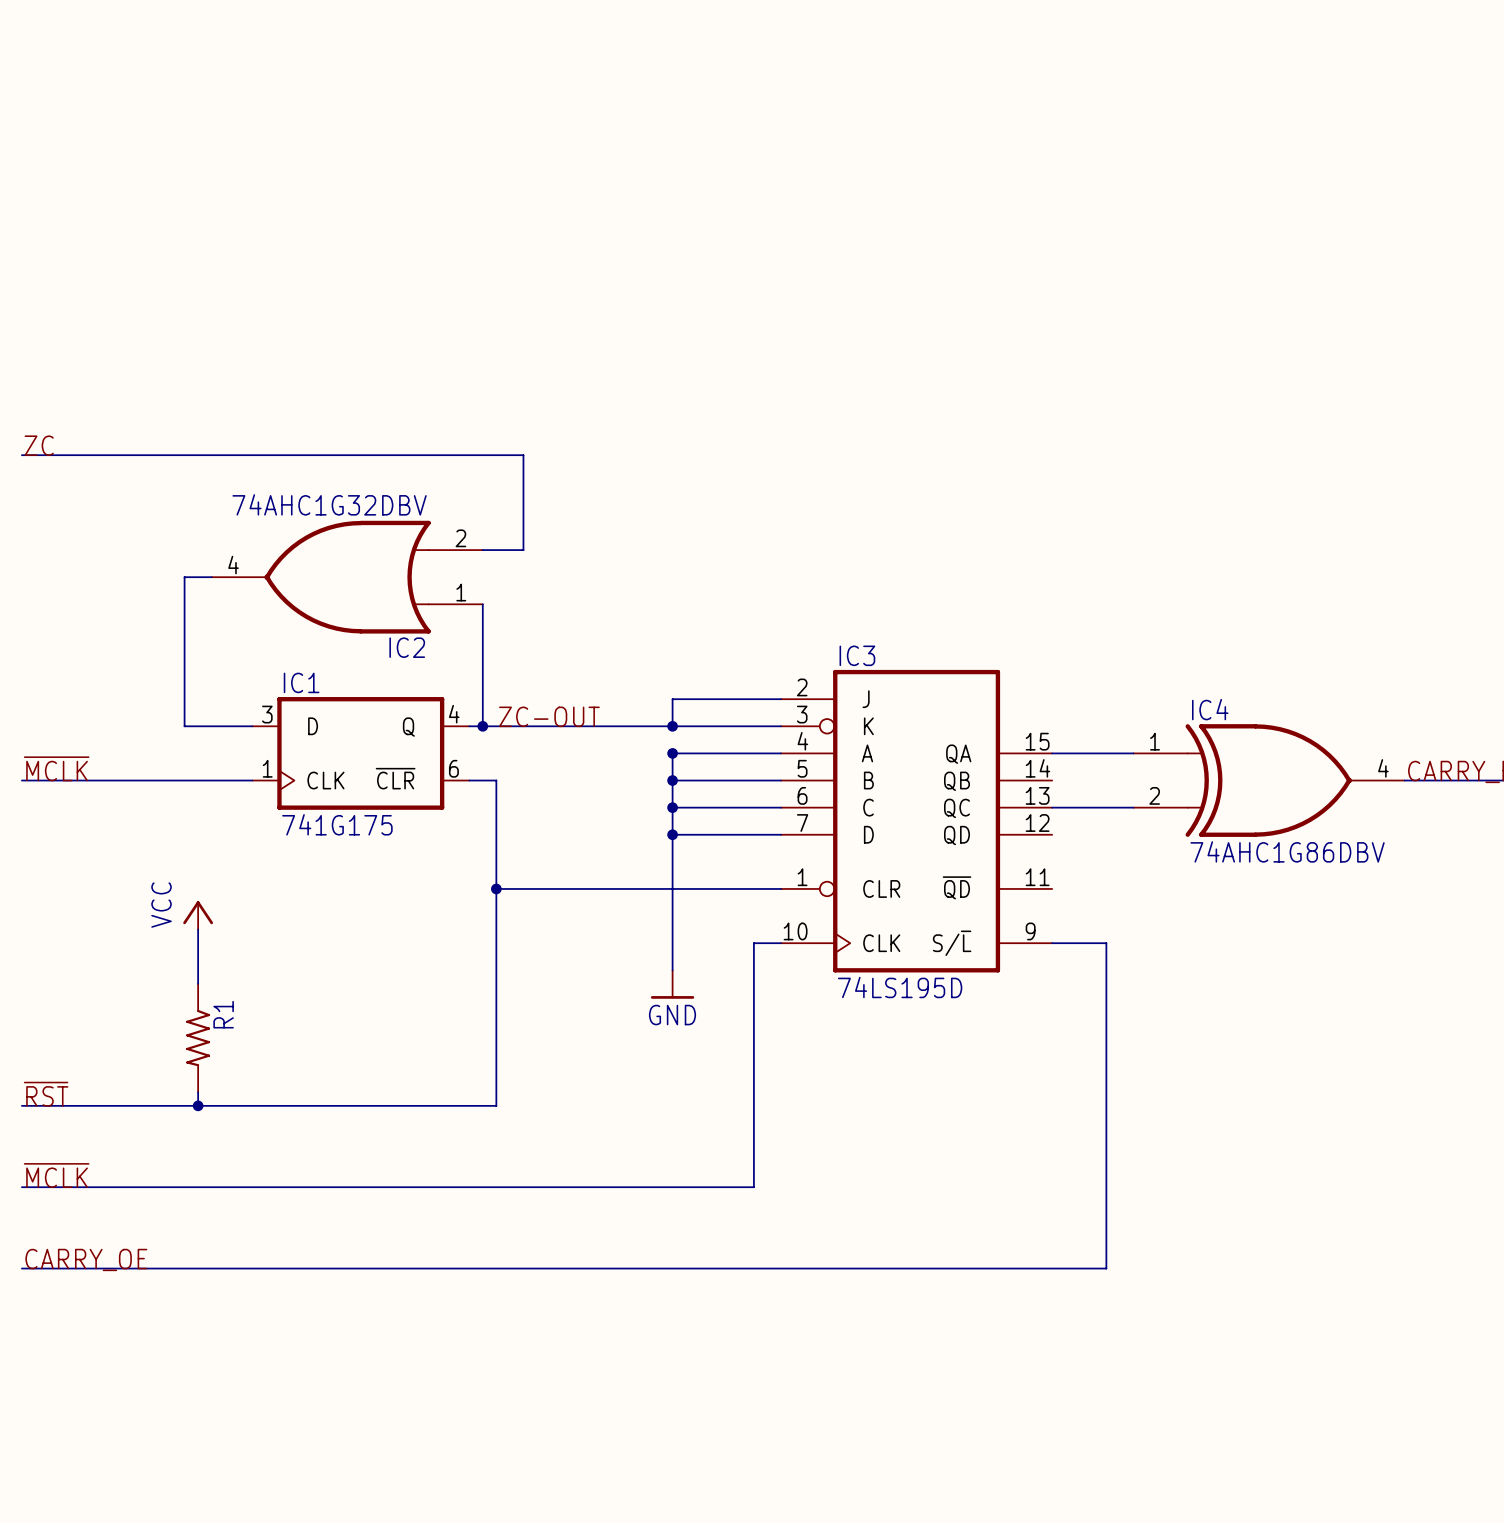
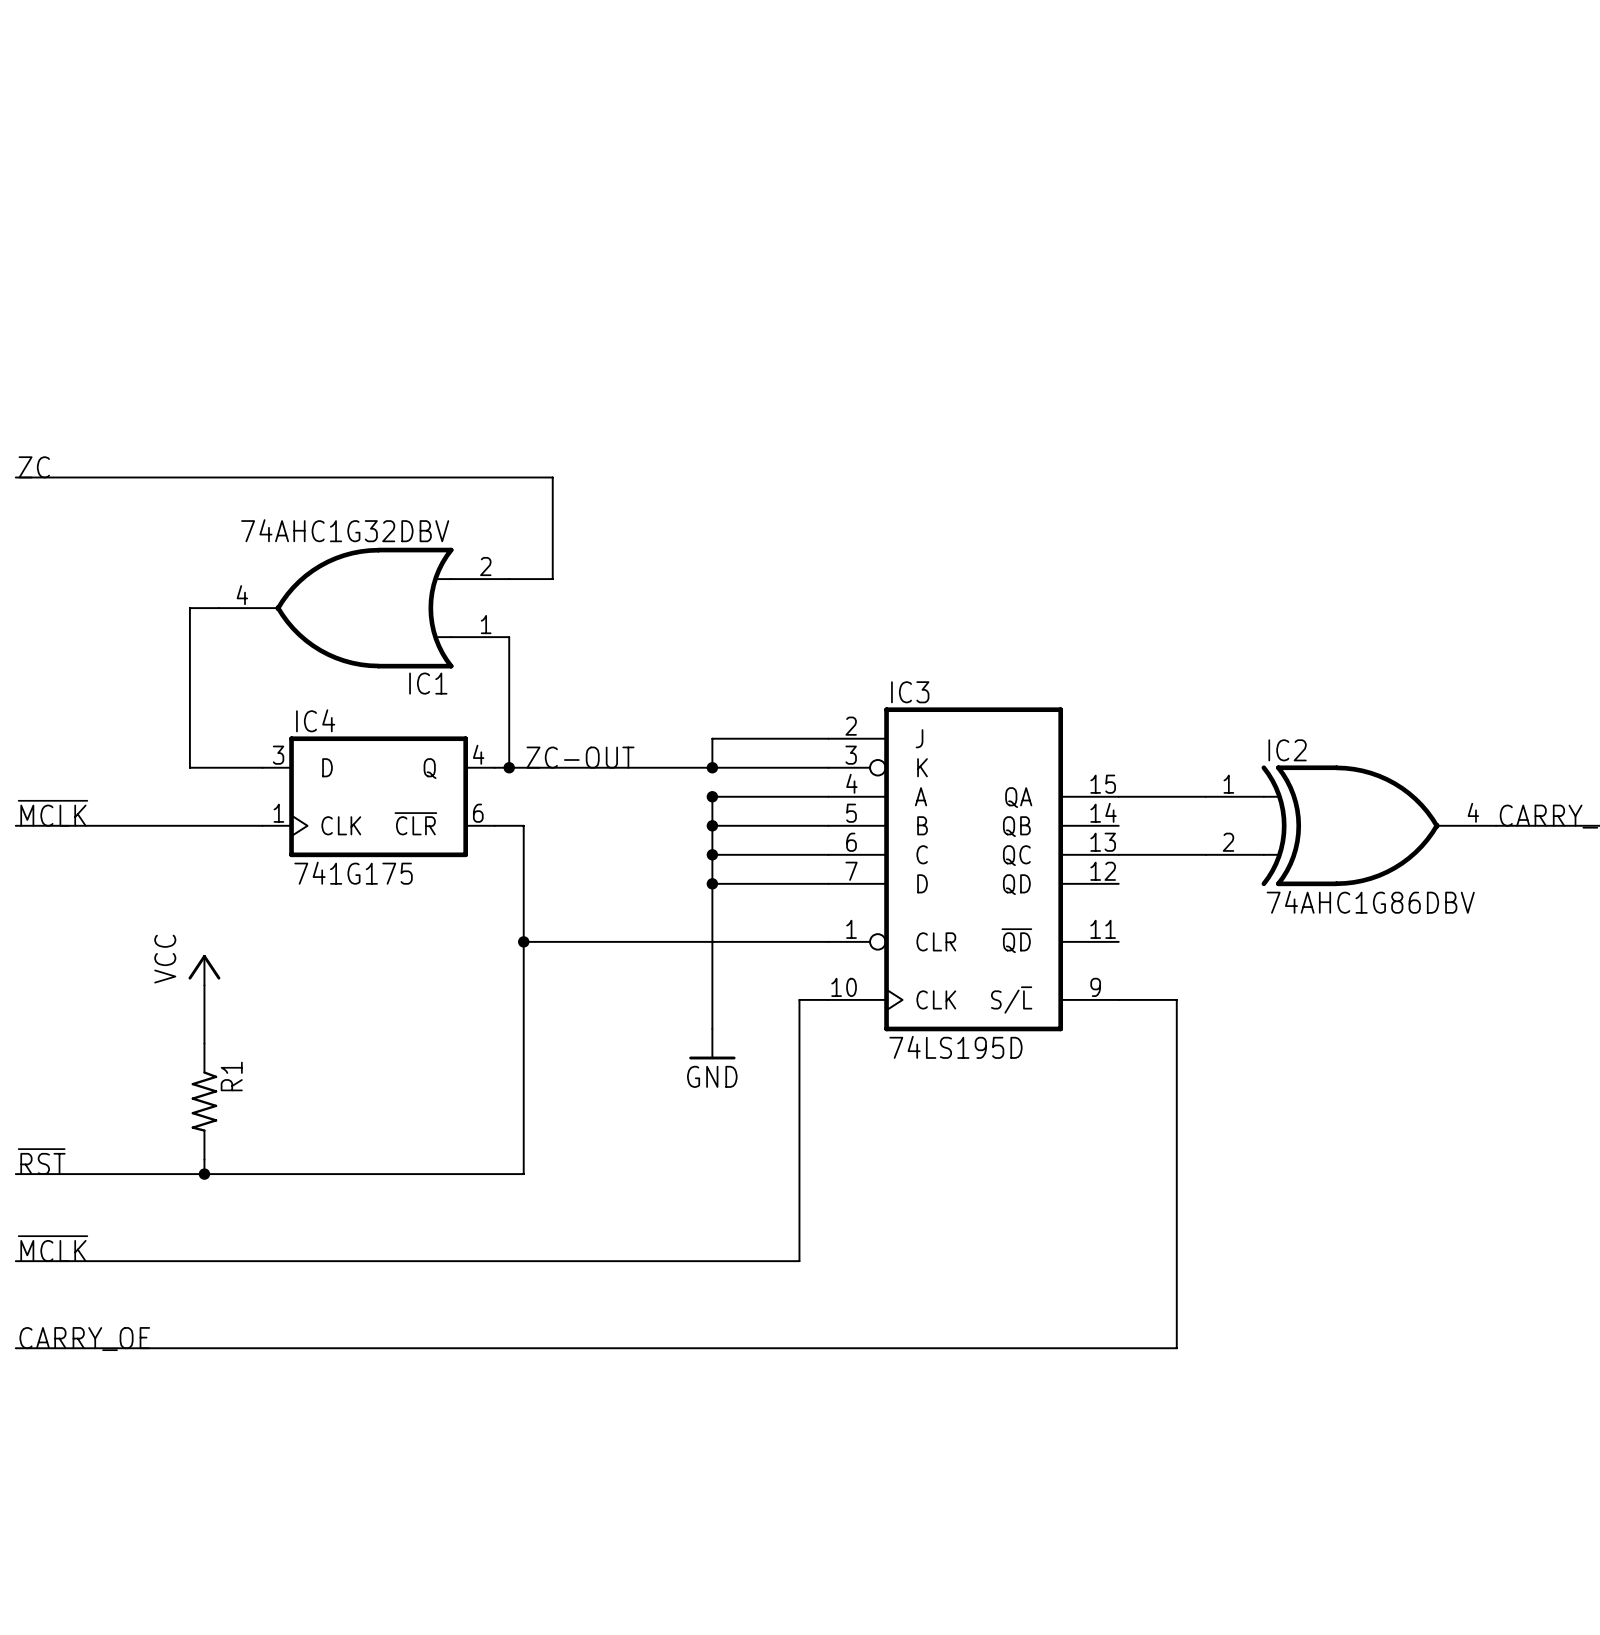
IC2 name: IC2 (407, 647) -> IC1 (428, 683)
IC1 name: IC1 (301, 682) -> IC4 (315, 720)
IC4 name: IC4 (1210, 709) -> IC2 (1287, 750)

